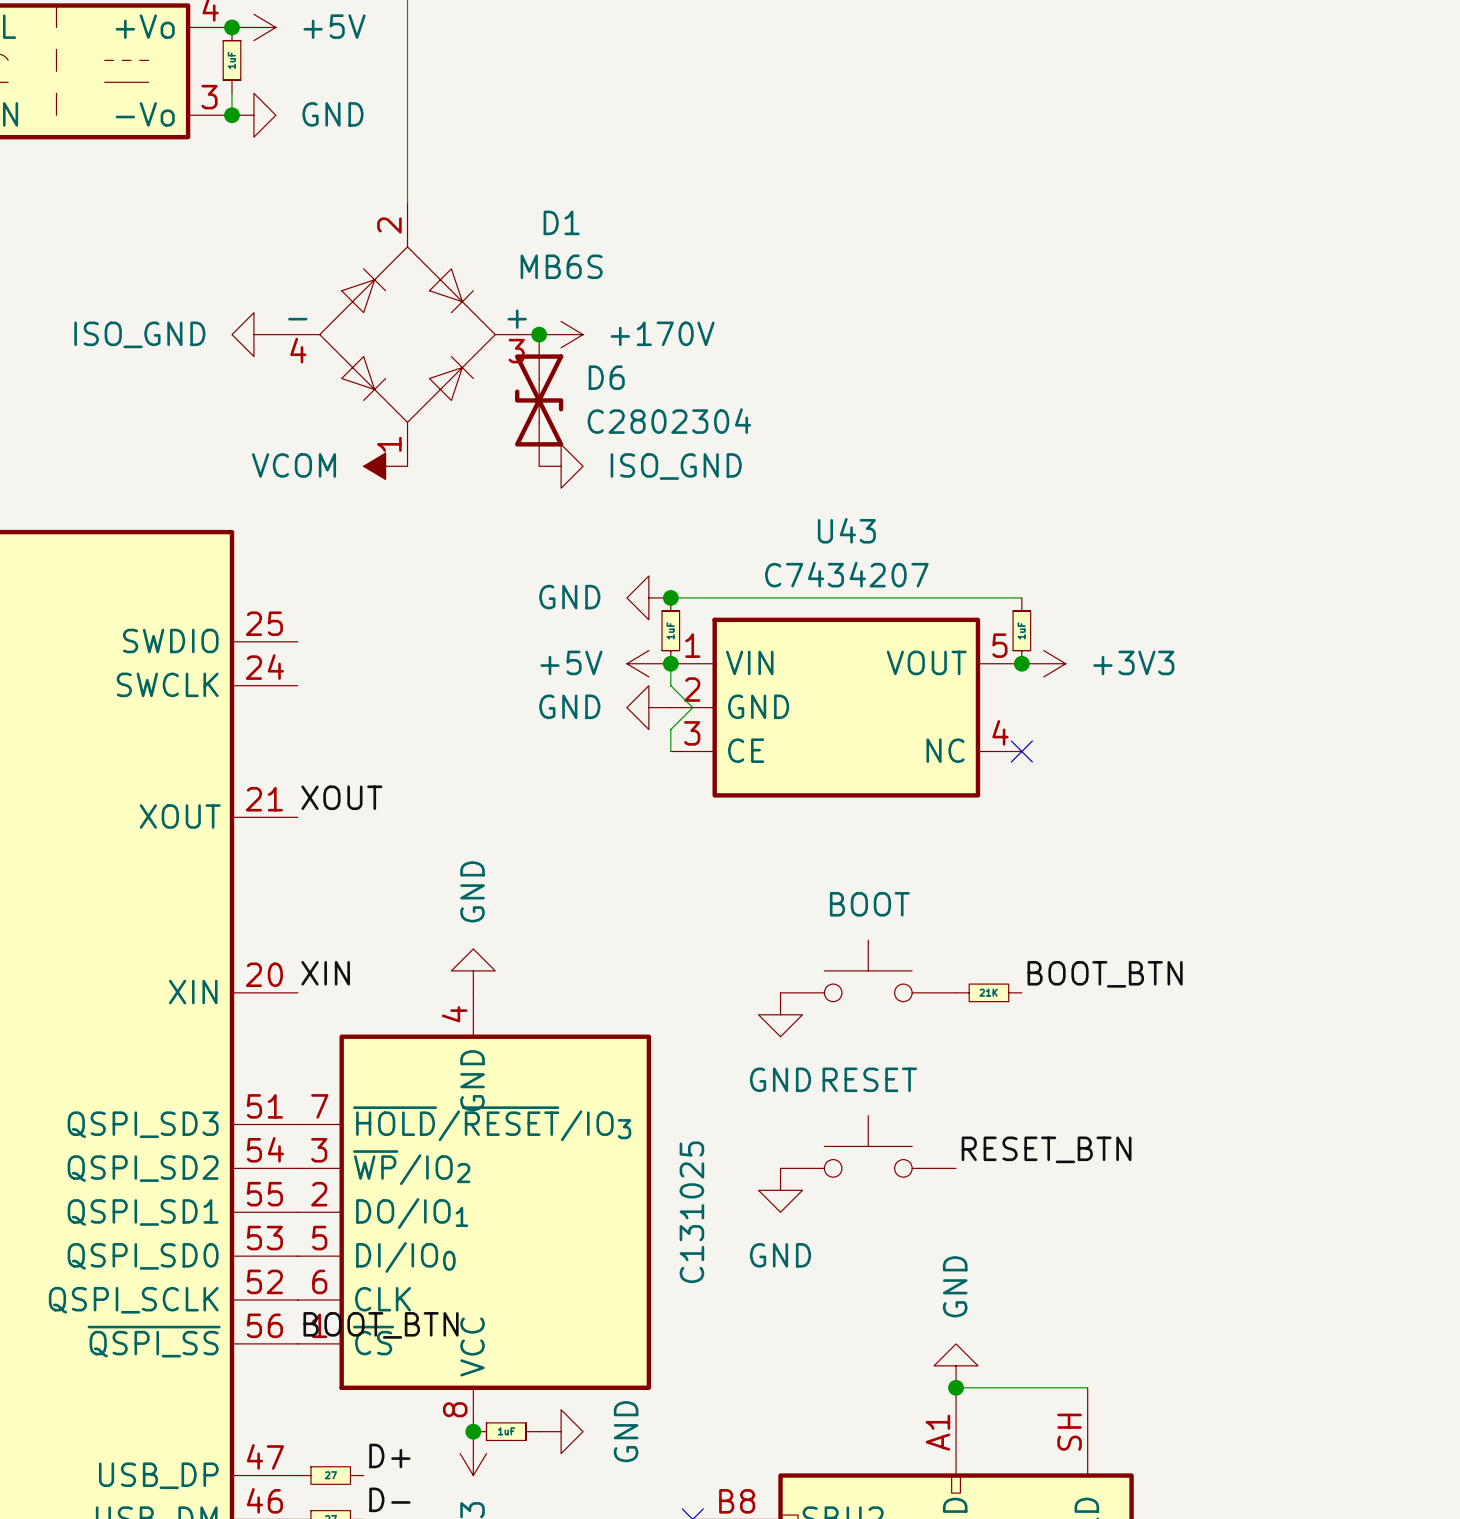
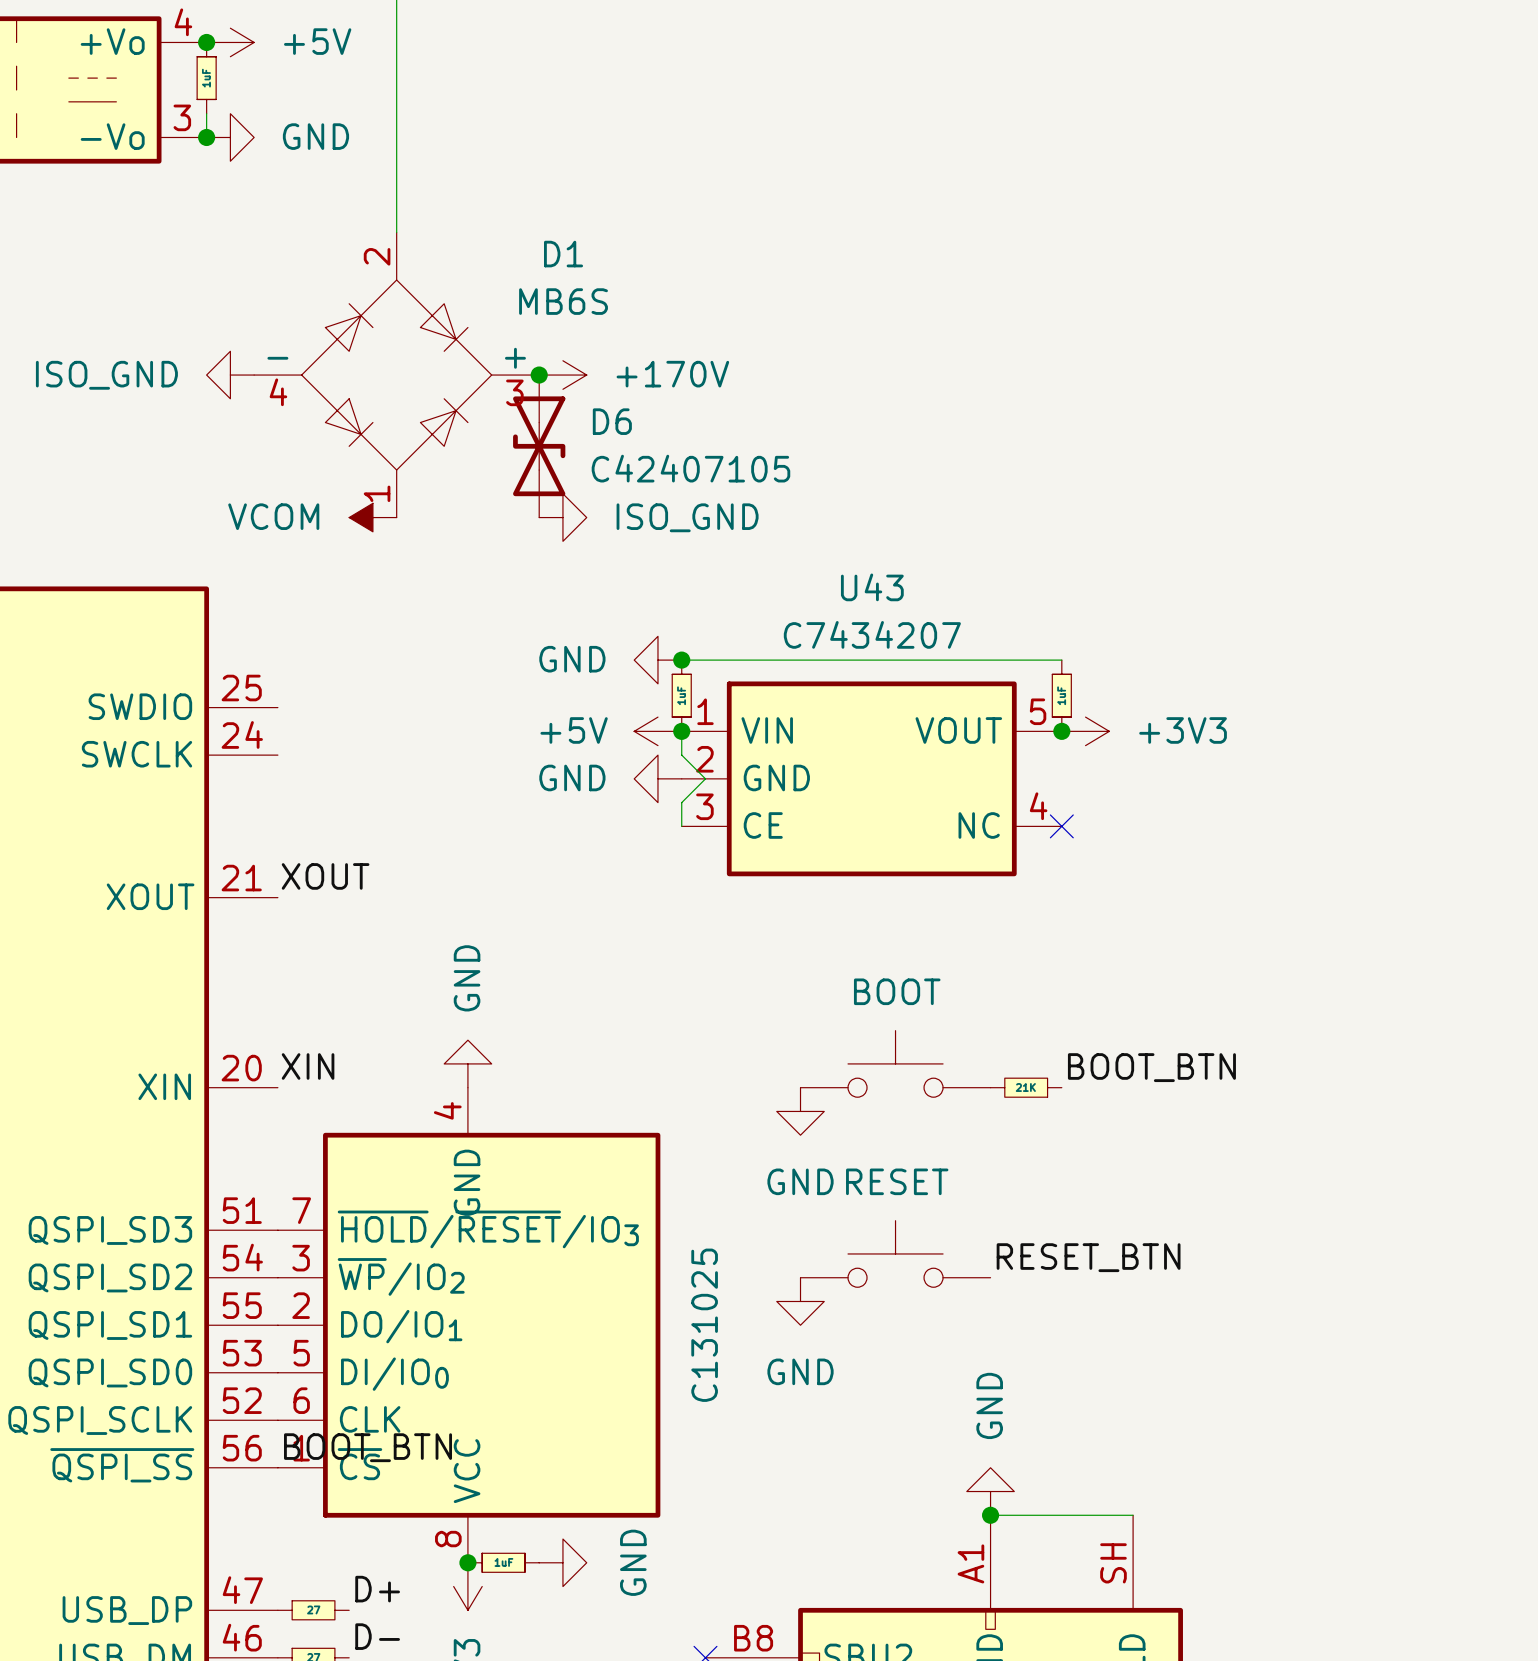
D6 value: C2802304 (669, 421) -> C42407105 (690, 468)

